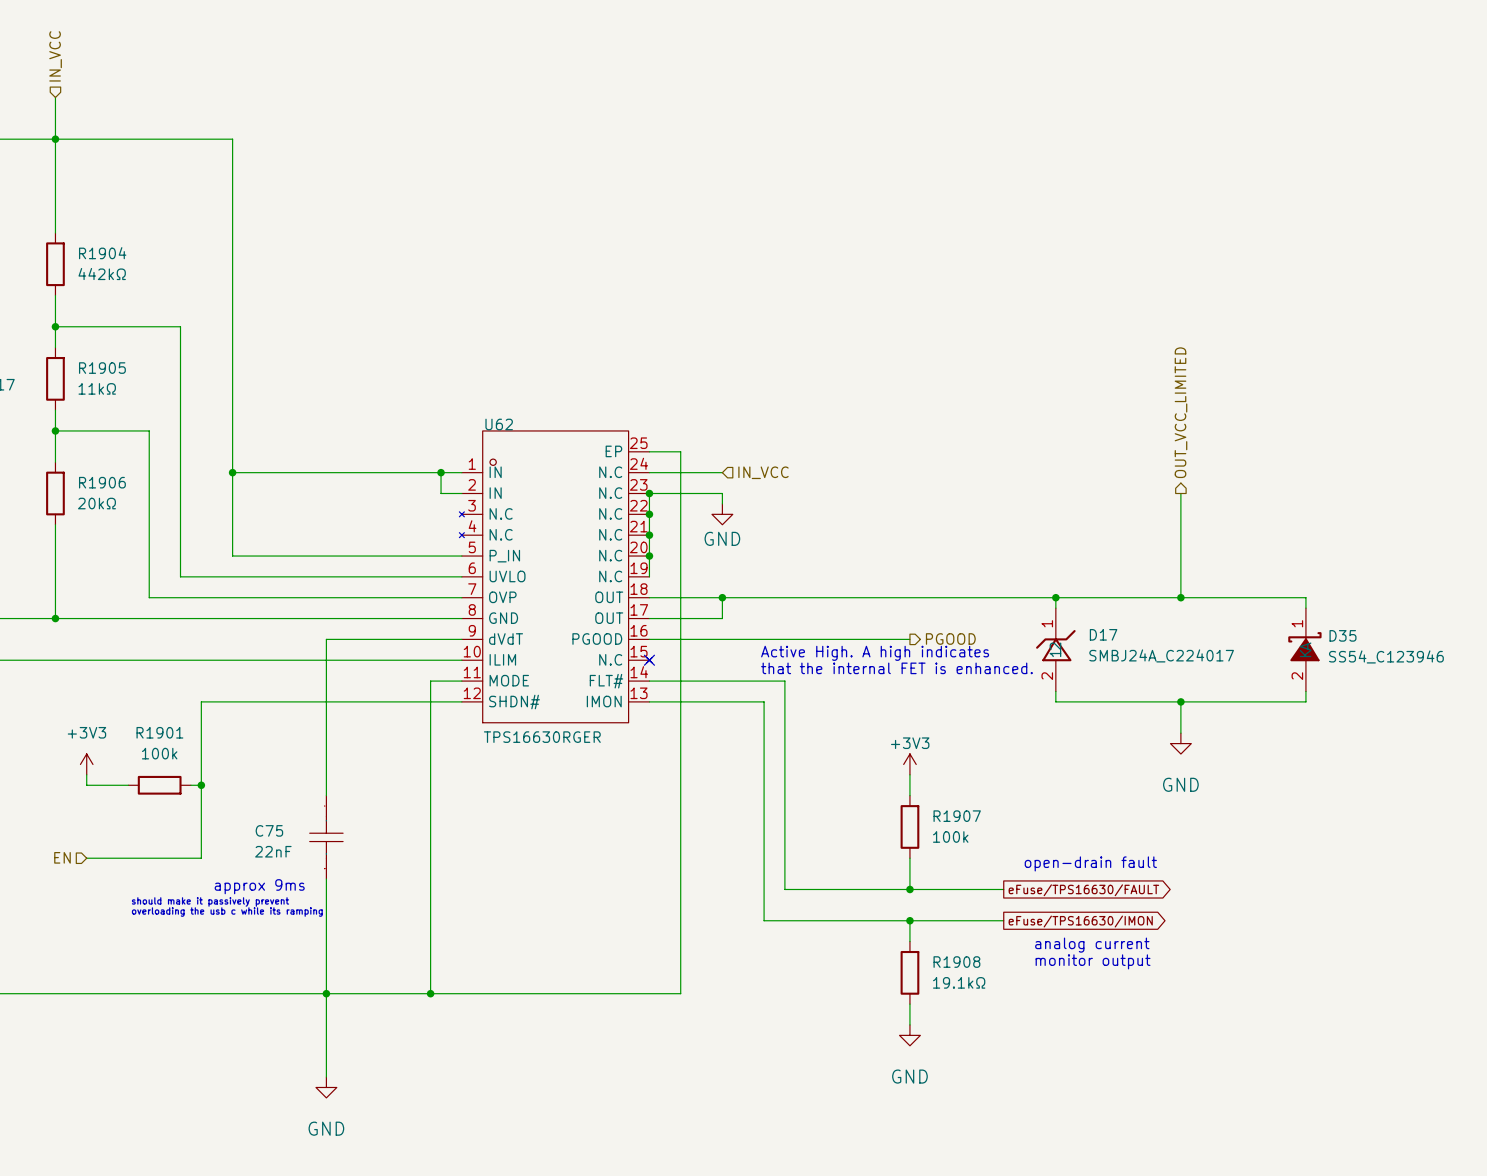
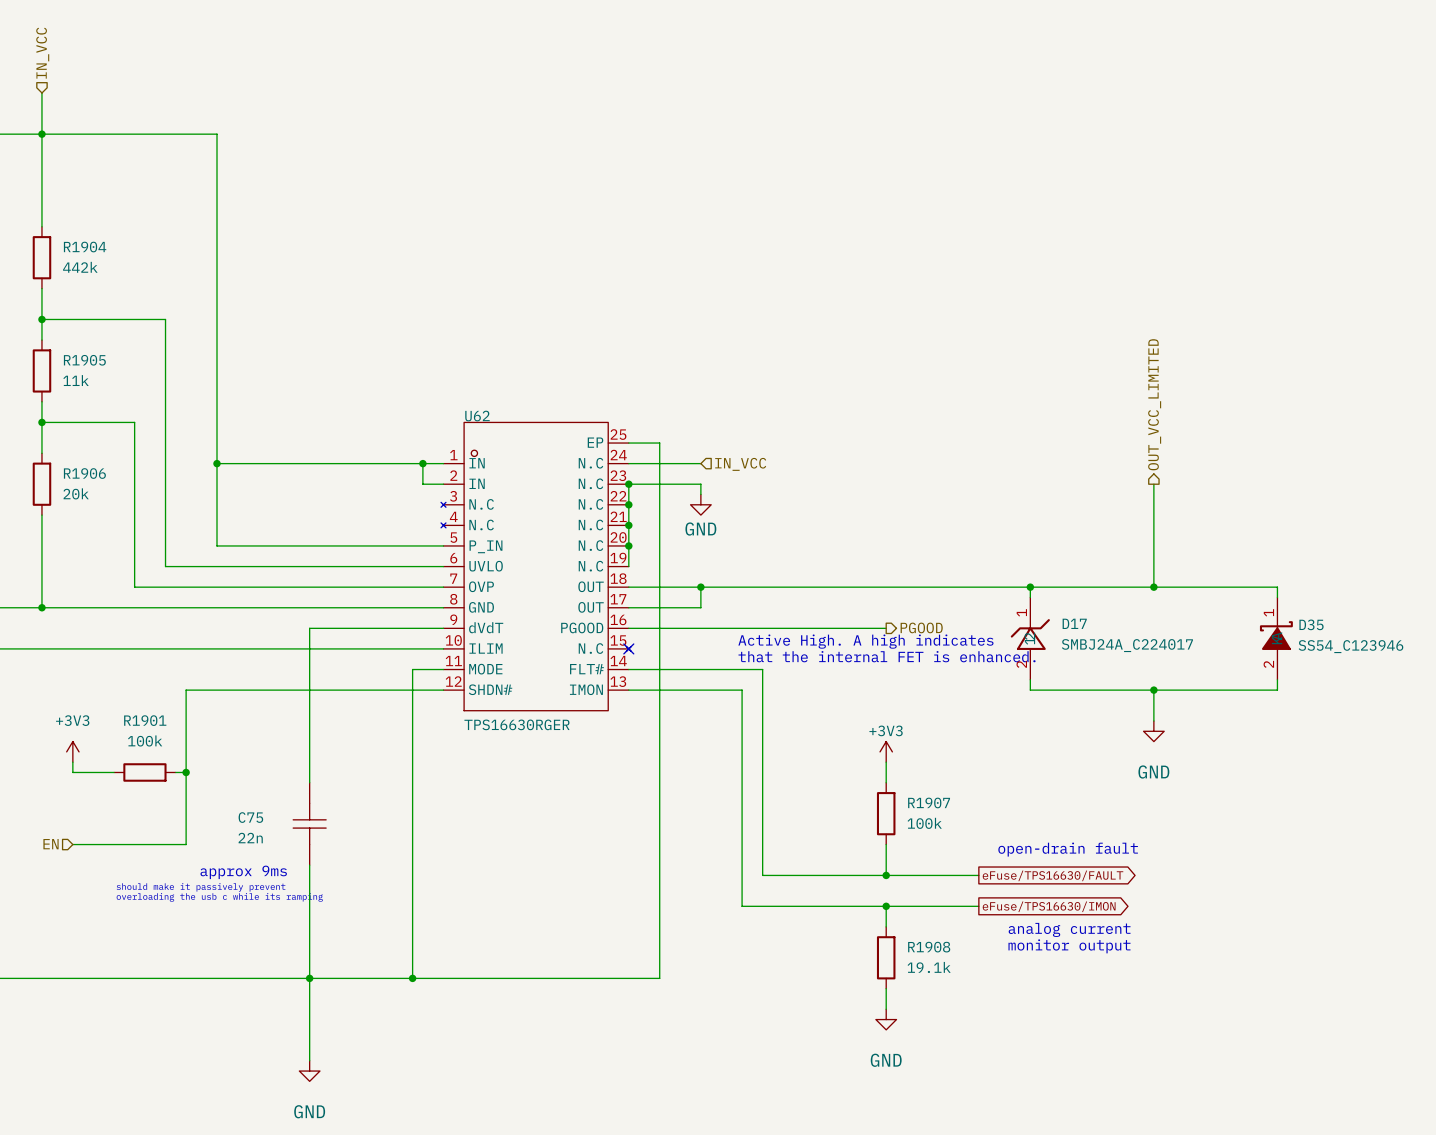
R1904 value: 442kΩ (102, 274) -> 442k (80, 267)
R1905 value: 11kΩ (97, 388) -> 11k (76, 380)
R1906 value: 20kΩ (96, 503) -> 20k (76, 493)
C75 value: 22nF (273, 851) -> 22n (250, 838)
R1908 value: 19.1kΩ (959, 982) -> 19.1k (929, 967)

